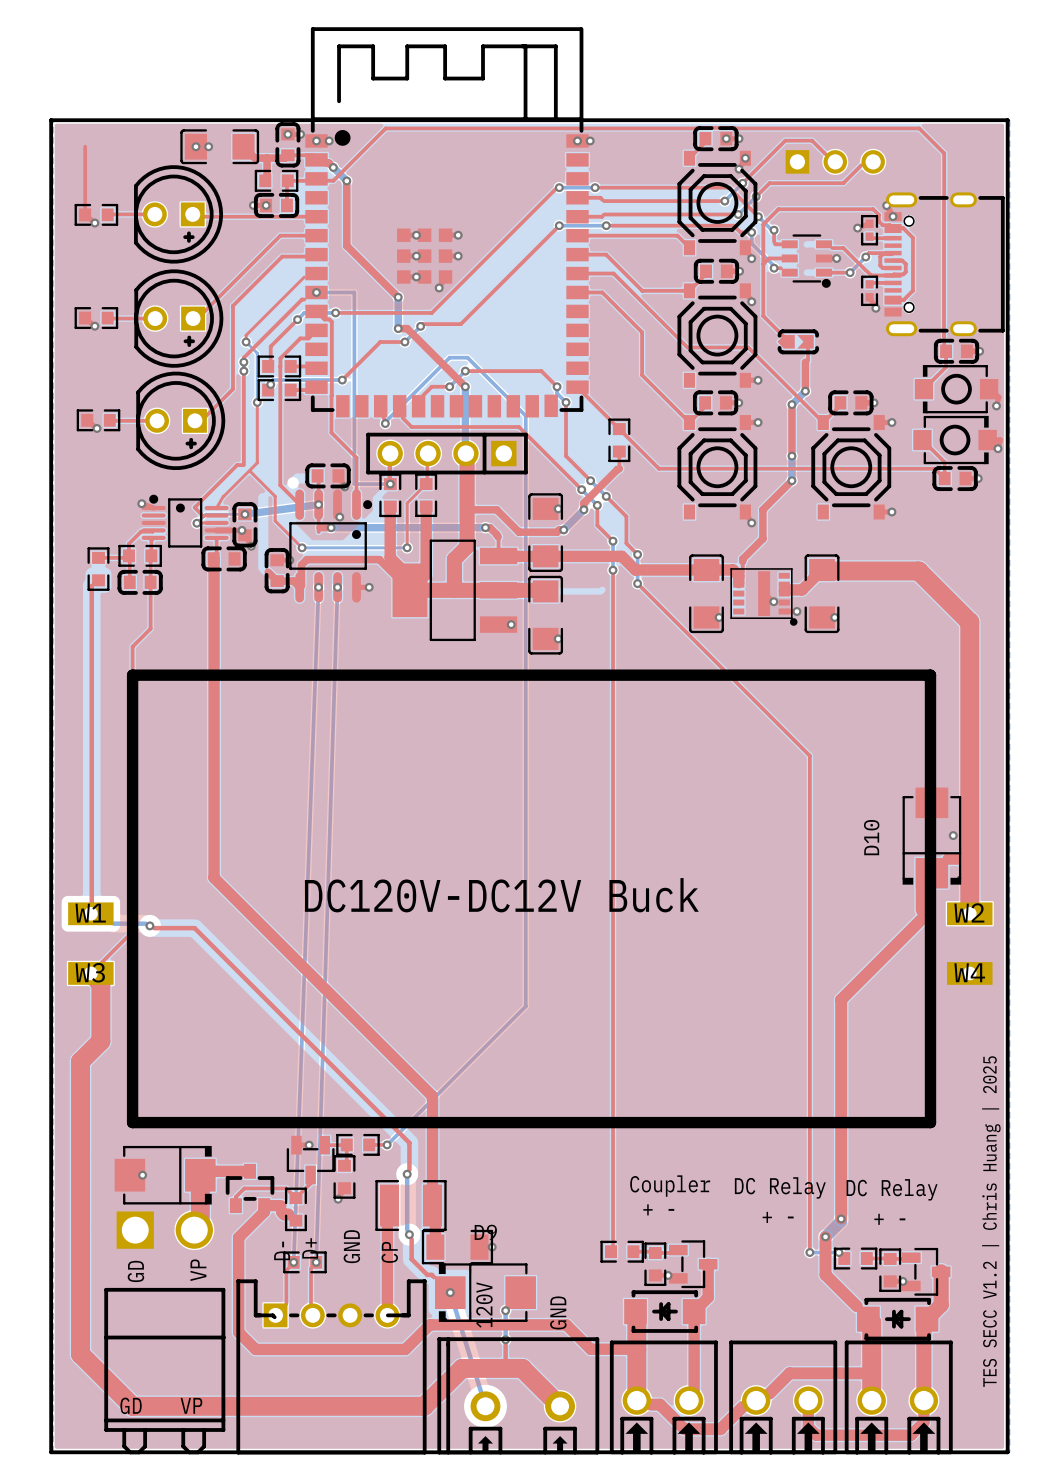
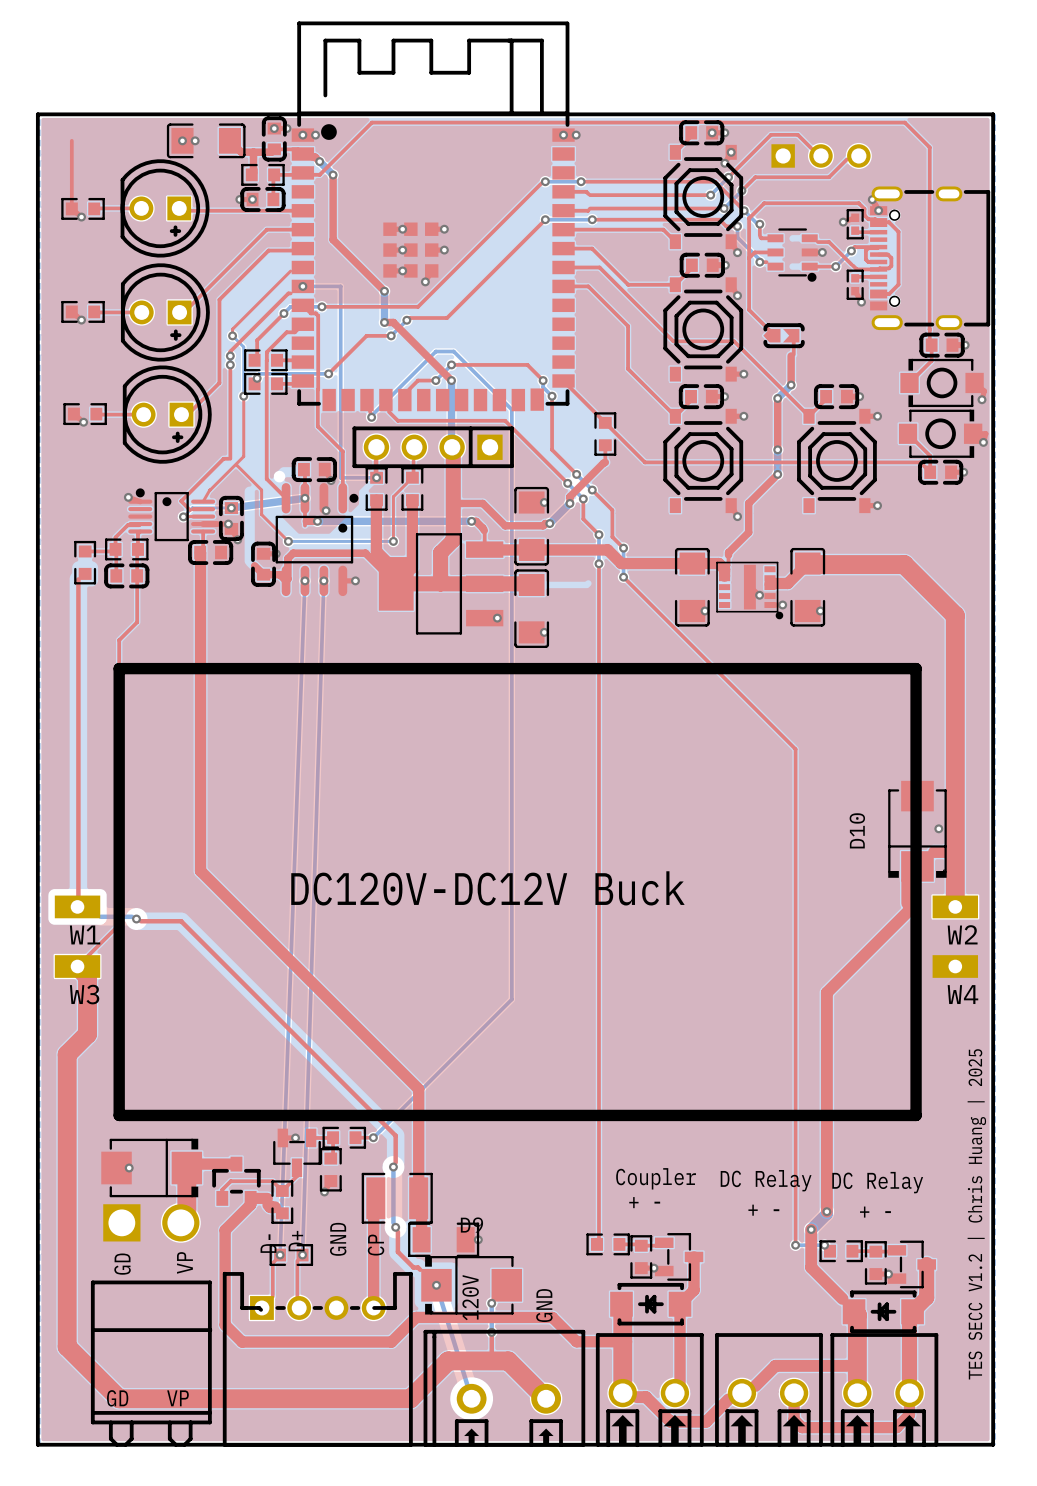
W2 name position: W2 (969, 912) -> W2 (962, 934)
W1 name position: W1 (90, 913) -> W1 (85, 934)
W3 name position: W3 (90, 972) -> W3 (84, 994)
W4 name position: W4 (969, 972) -> W4 (962, 994)

